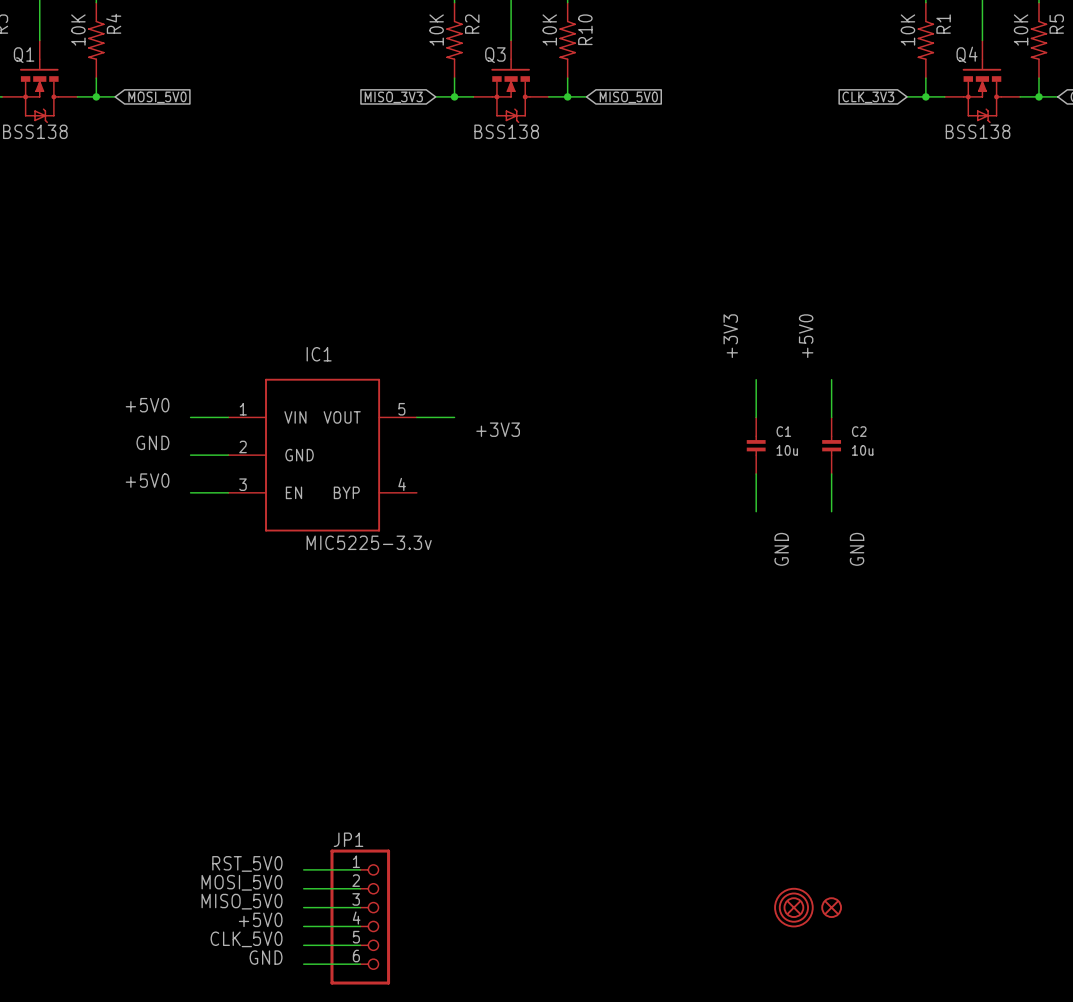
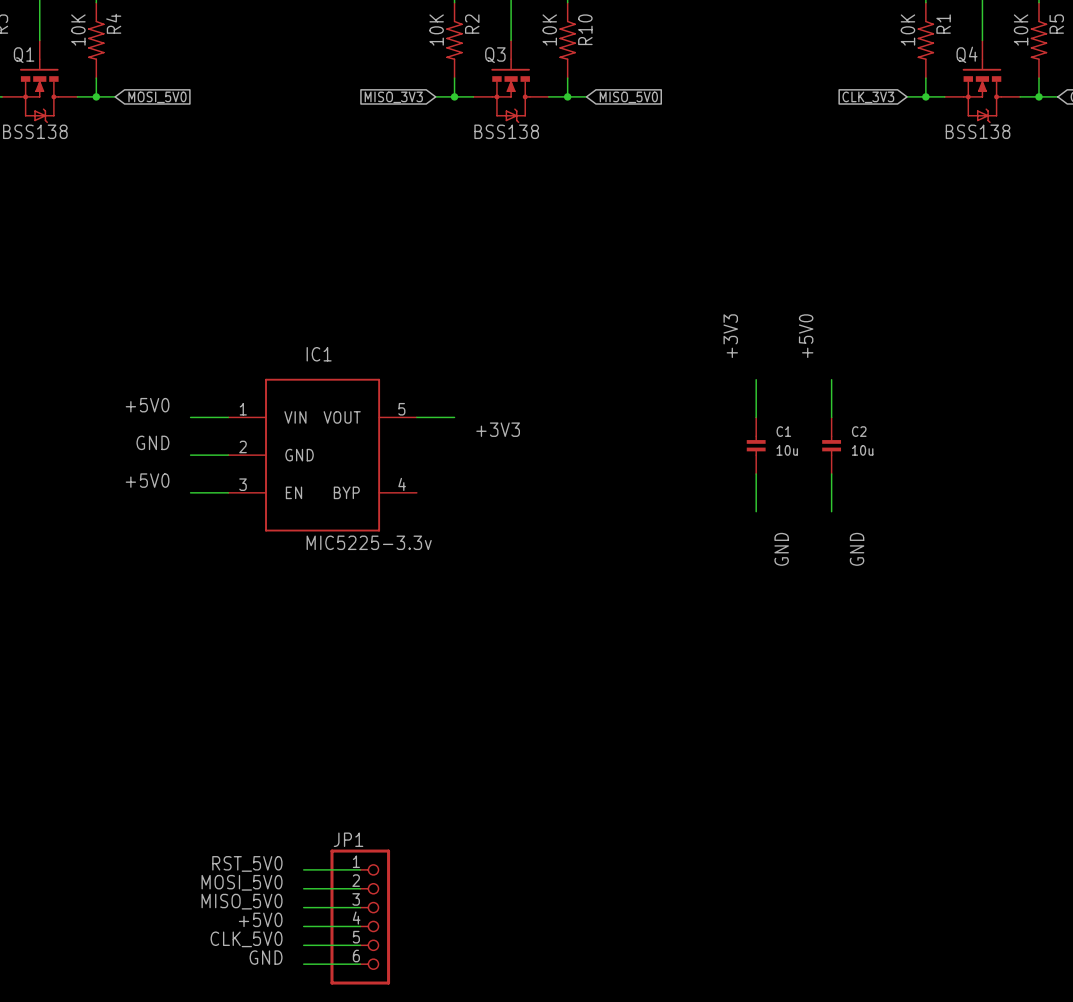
part: (793, 907) -> none
part: (793, 907) -> none
part: (831, 907) -> none

